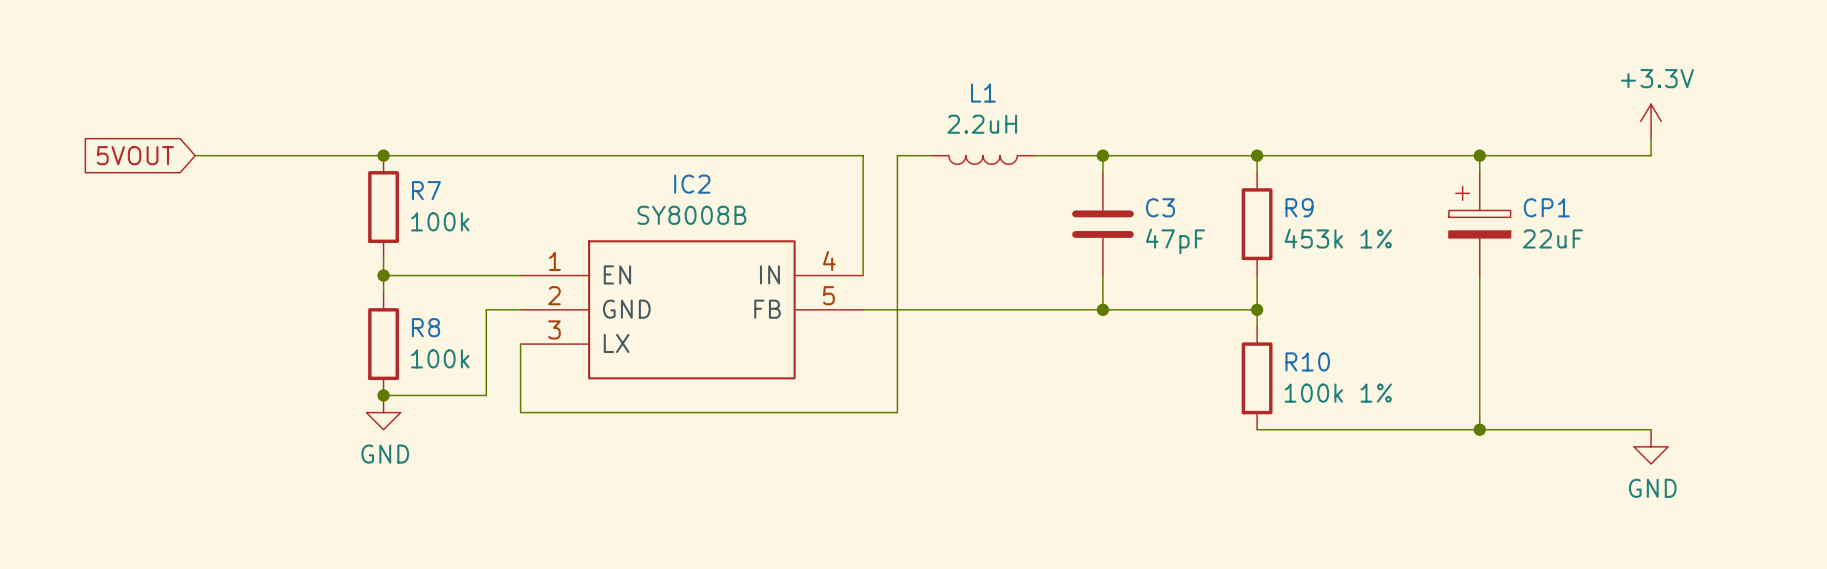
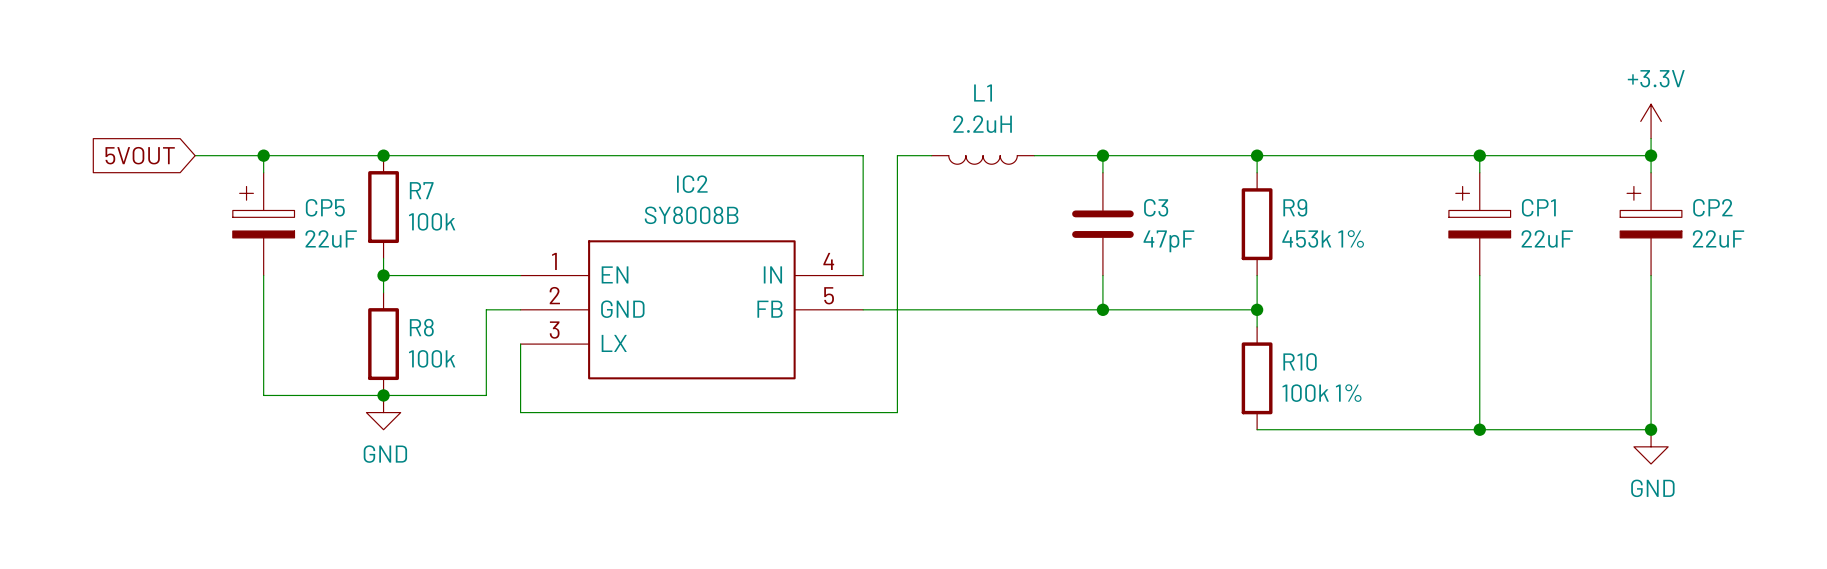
wire: none -> (263, 155) (263, 172)
junction: none -> (263, 155)
wire: none -> (1651, 155) (1651, 172)
junction: none -> (1651, 155)
CP5: none -> 22uF (263, 224)
CP2: none -> 22uF (1651, 224)
wire: none -> (263, 275) (263, 395) (383, 395)
wire: none -> (1651, 275) (1651, 429)
junction: none -> (1651, 429)

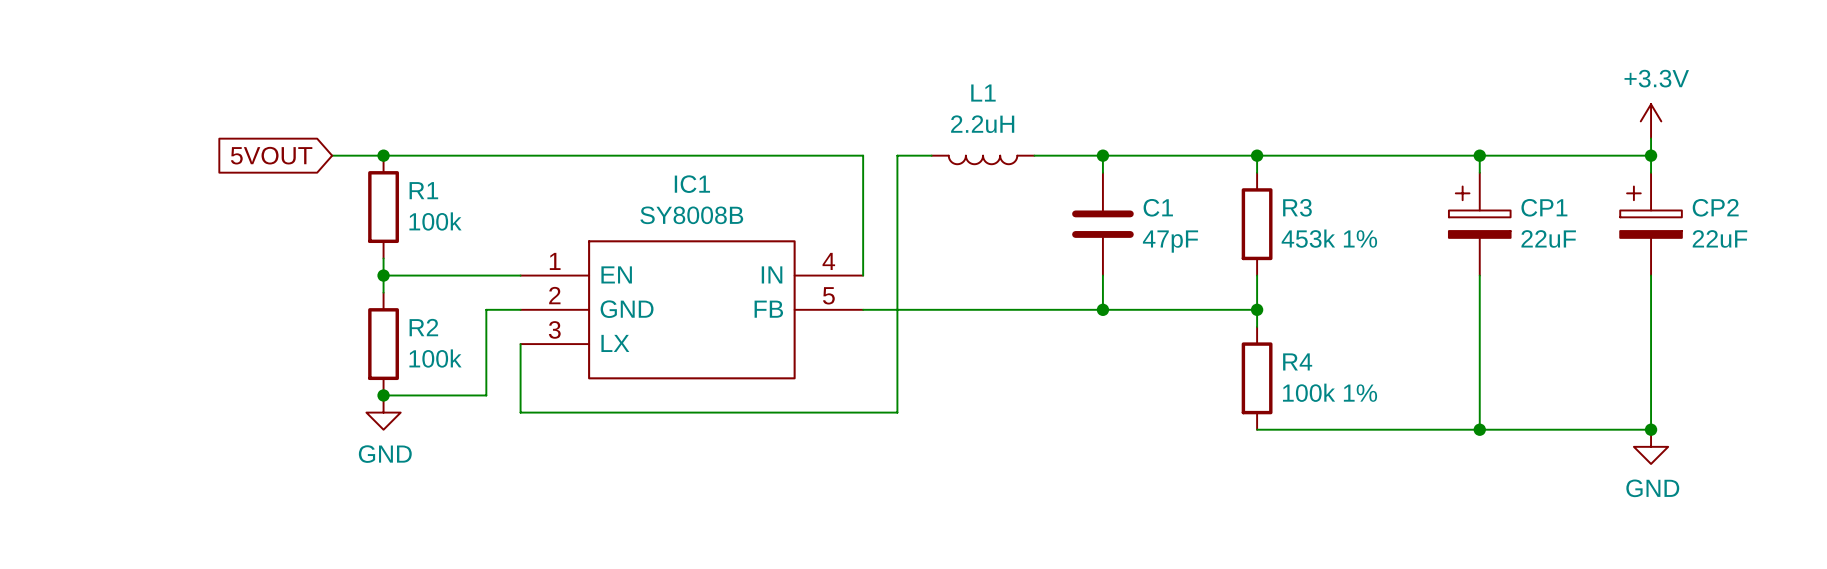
global label position: 5VOUT (140, 155) -> 5VOUT (271, 155)
wire: (195, 155) (332, 155) -> none
wire: (263, 155) (263, 172) -> none
junction: (263, 155) -> none
IC2 name: IC2 (692, 184) -> IC1 (692, 184)
R7 name: R7 (421, 190) -> R1 (423, 190)
C3 name: C3 (1156, 207) -> C1 (1158, 207)
R9 name: R9 (1295, 207) -> R3 (1297, 207)
CP5: 22uF (263, 224) -> none
wire: (263, 275) (263, 395) (383, 395) -> none
R8 name: R8 (421, 327) -> R2 (423, 327)
R10 name: R10 (1300, 361) -> R4 (1297, 361)

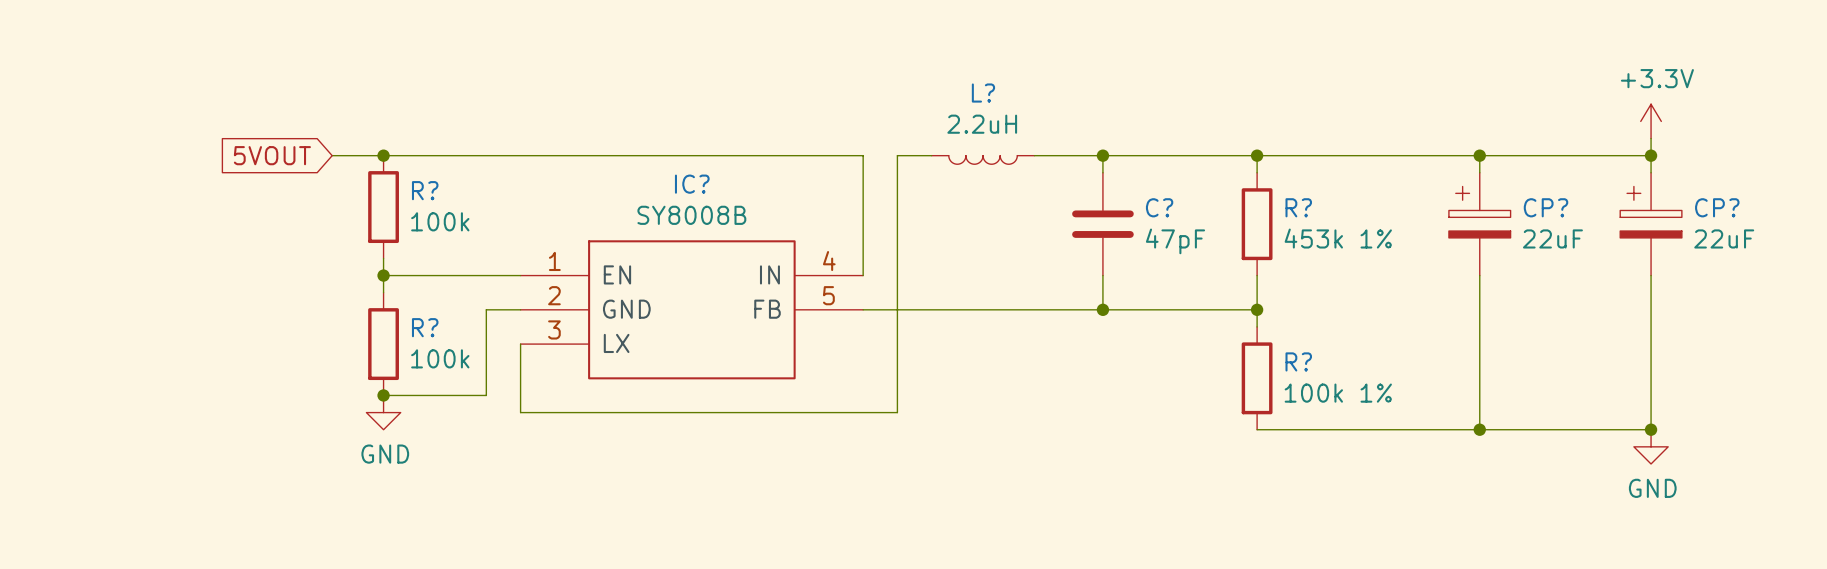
L1 name: L1 (983, 93) -> L? (983, 93)
IC1 name: IC1 (692, 184) -> IC? (692, 184)
R1 name: R1 (423, 190) -> R? (425, 190)
C1 name: C1 (1158, 207) -> C? (1159, 207)
R3 name: R3 (1297, 207) -> R? (1298, 207)
CP1 name: CP1 (1544, 207) -> CP? (1546, 207)
CP2 name: CP2 (1715, 207) -> CP? (1717, 207)
R2 name: R2 (423, 327) -> R? (425, 327)
R4 name: R4 (1297, 361) -> R? (1298, 361)

